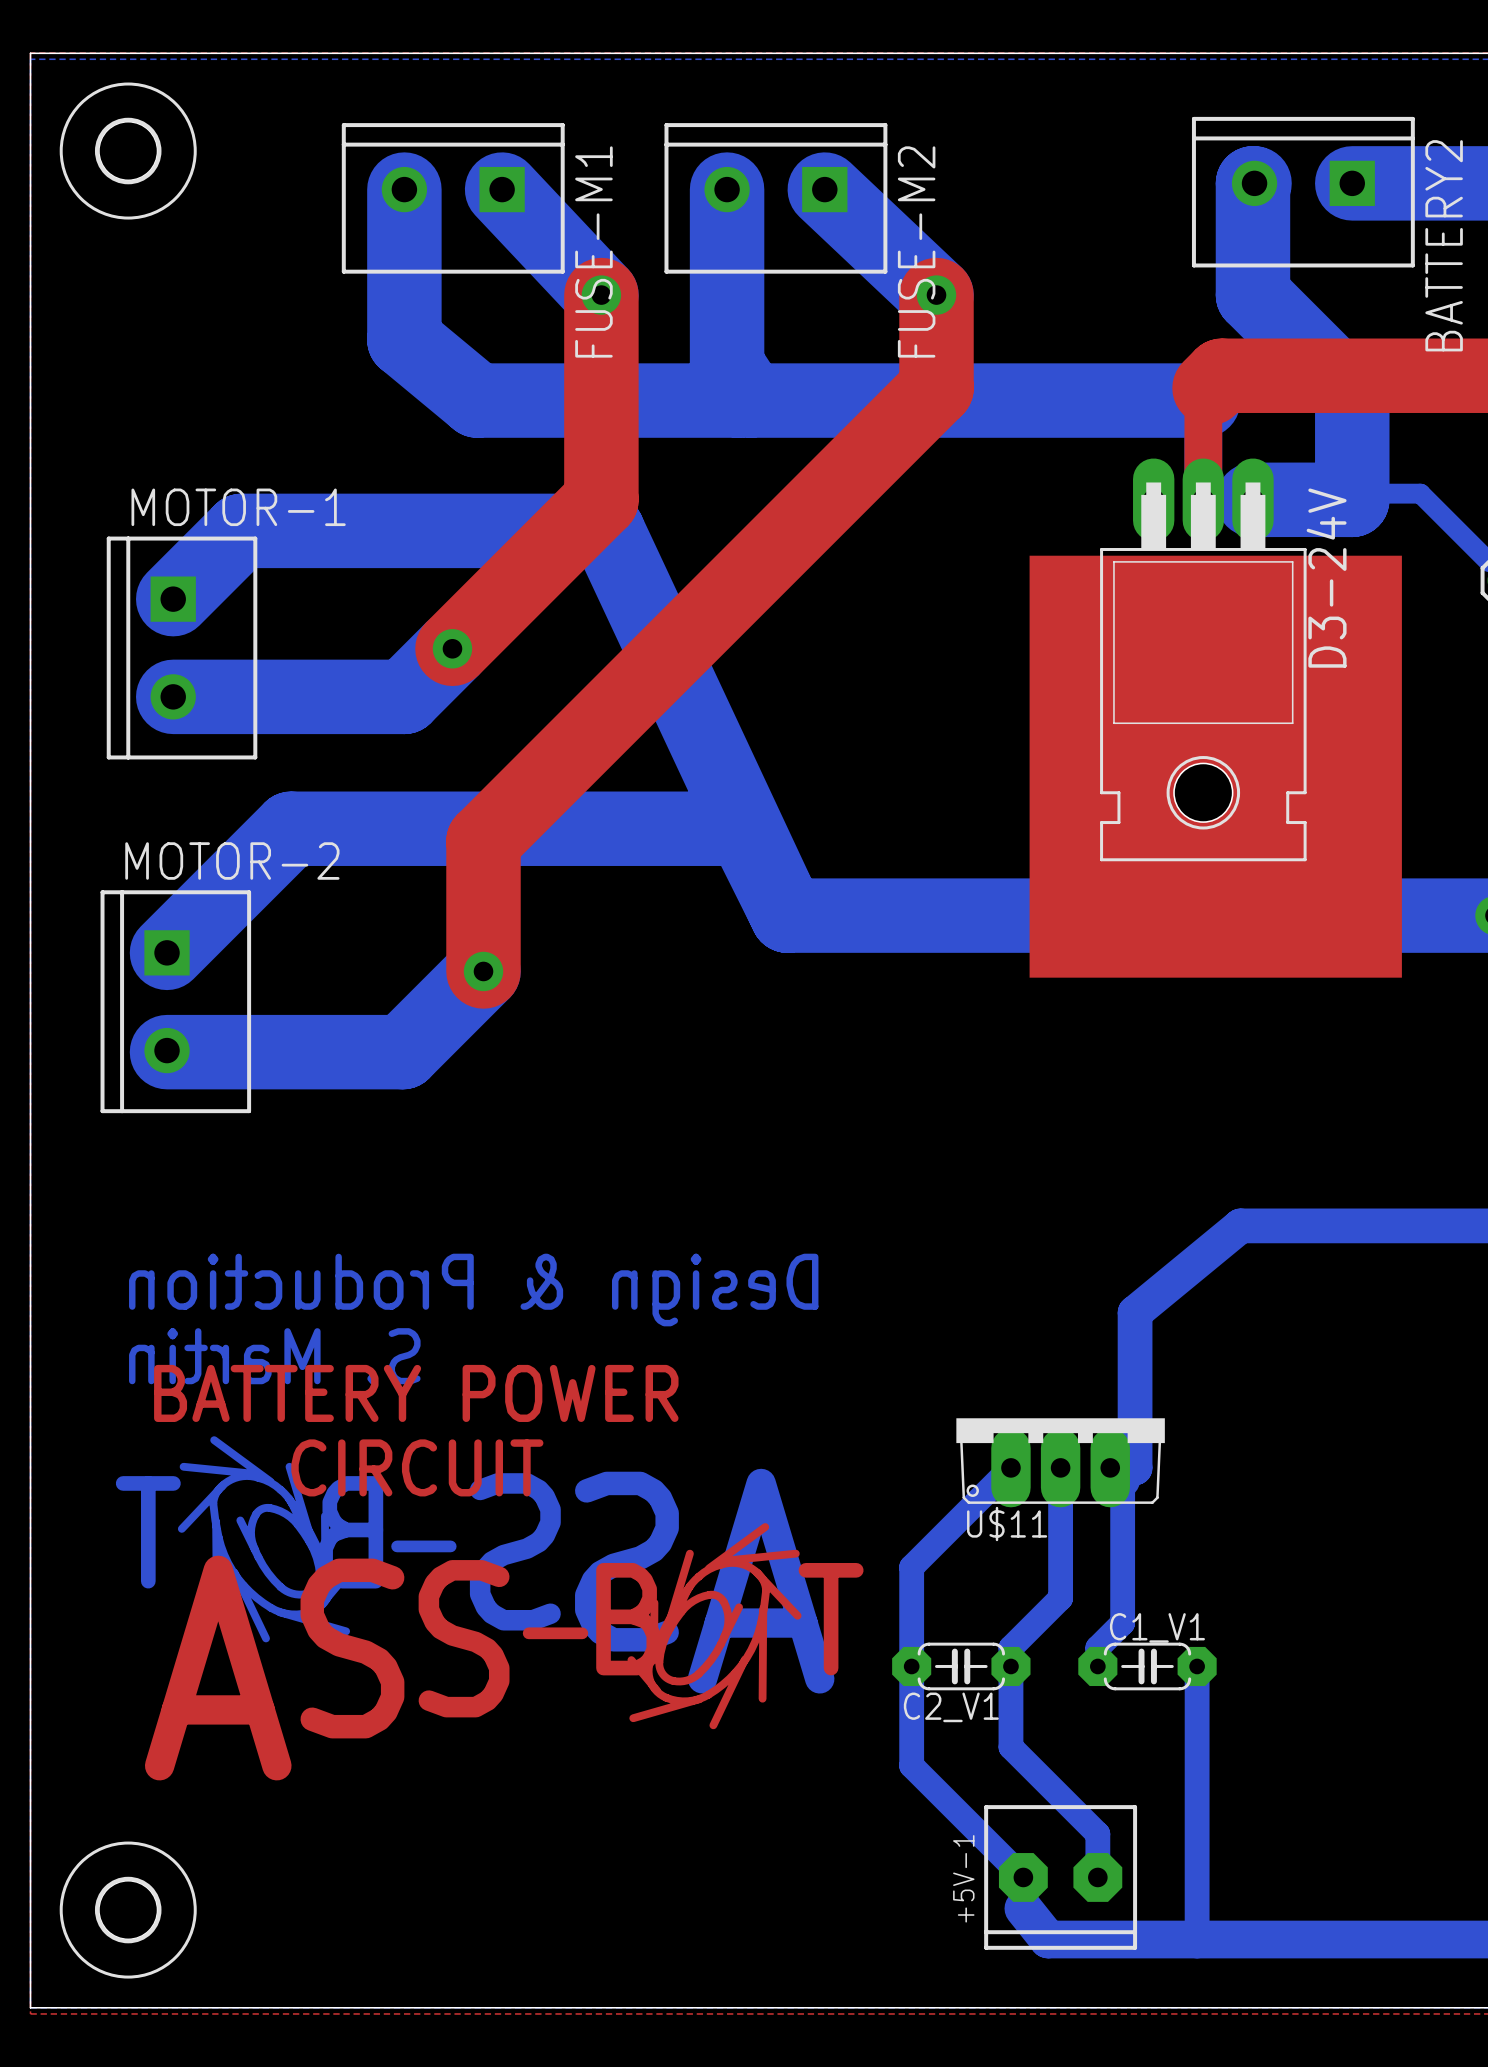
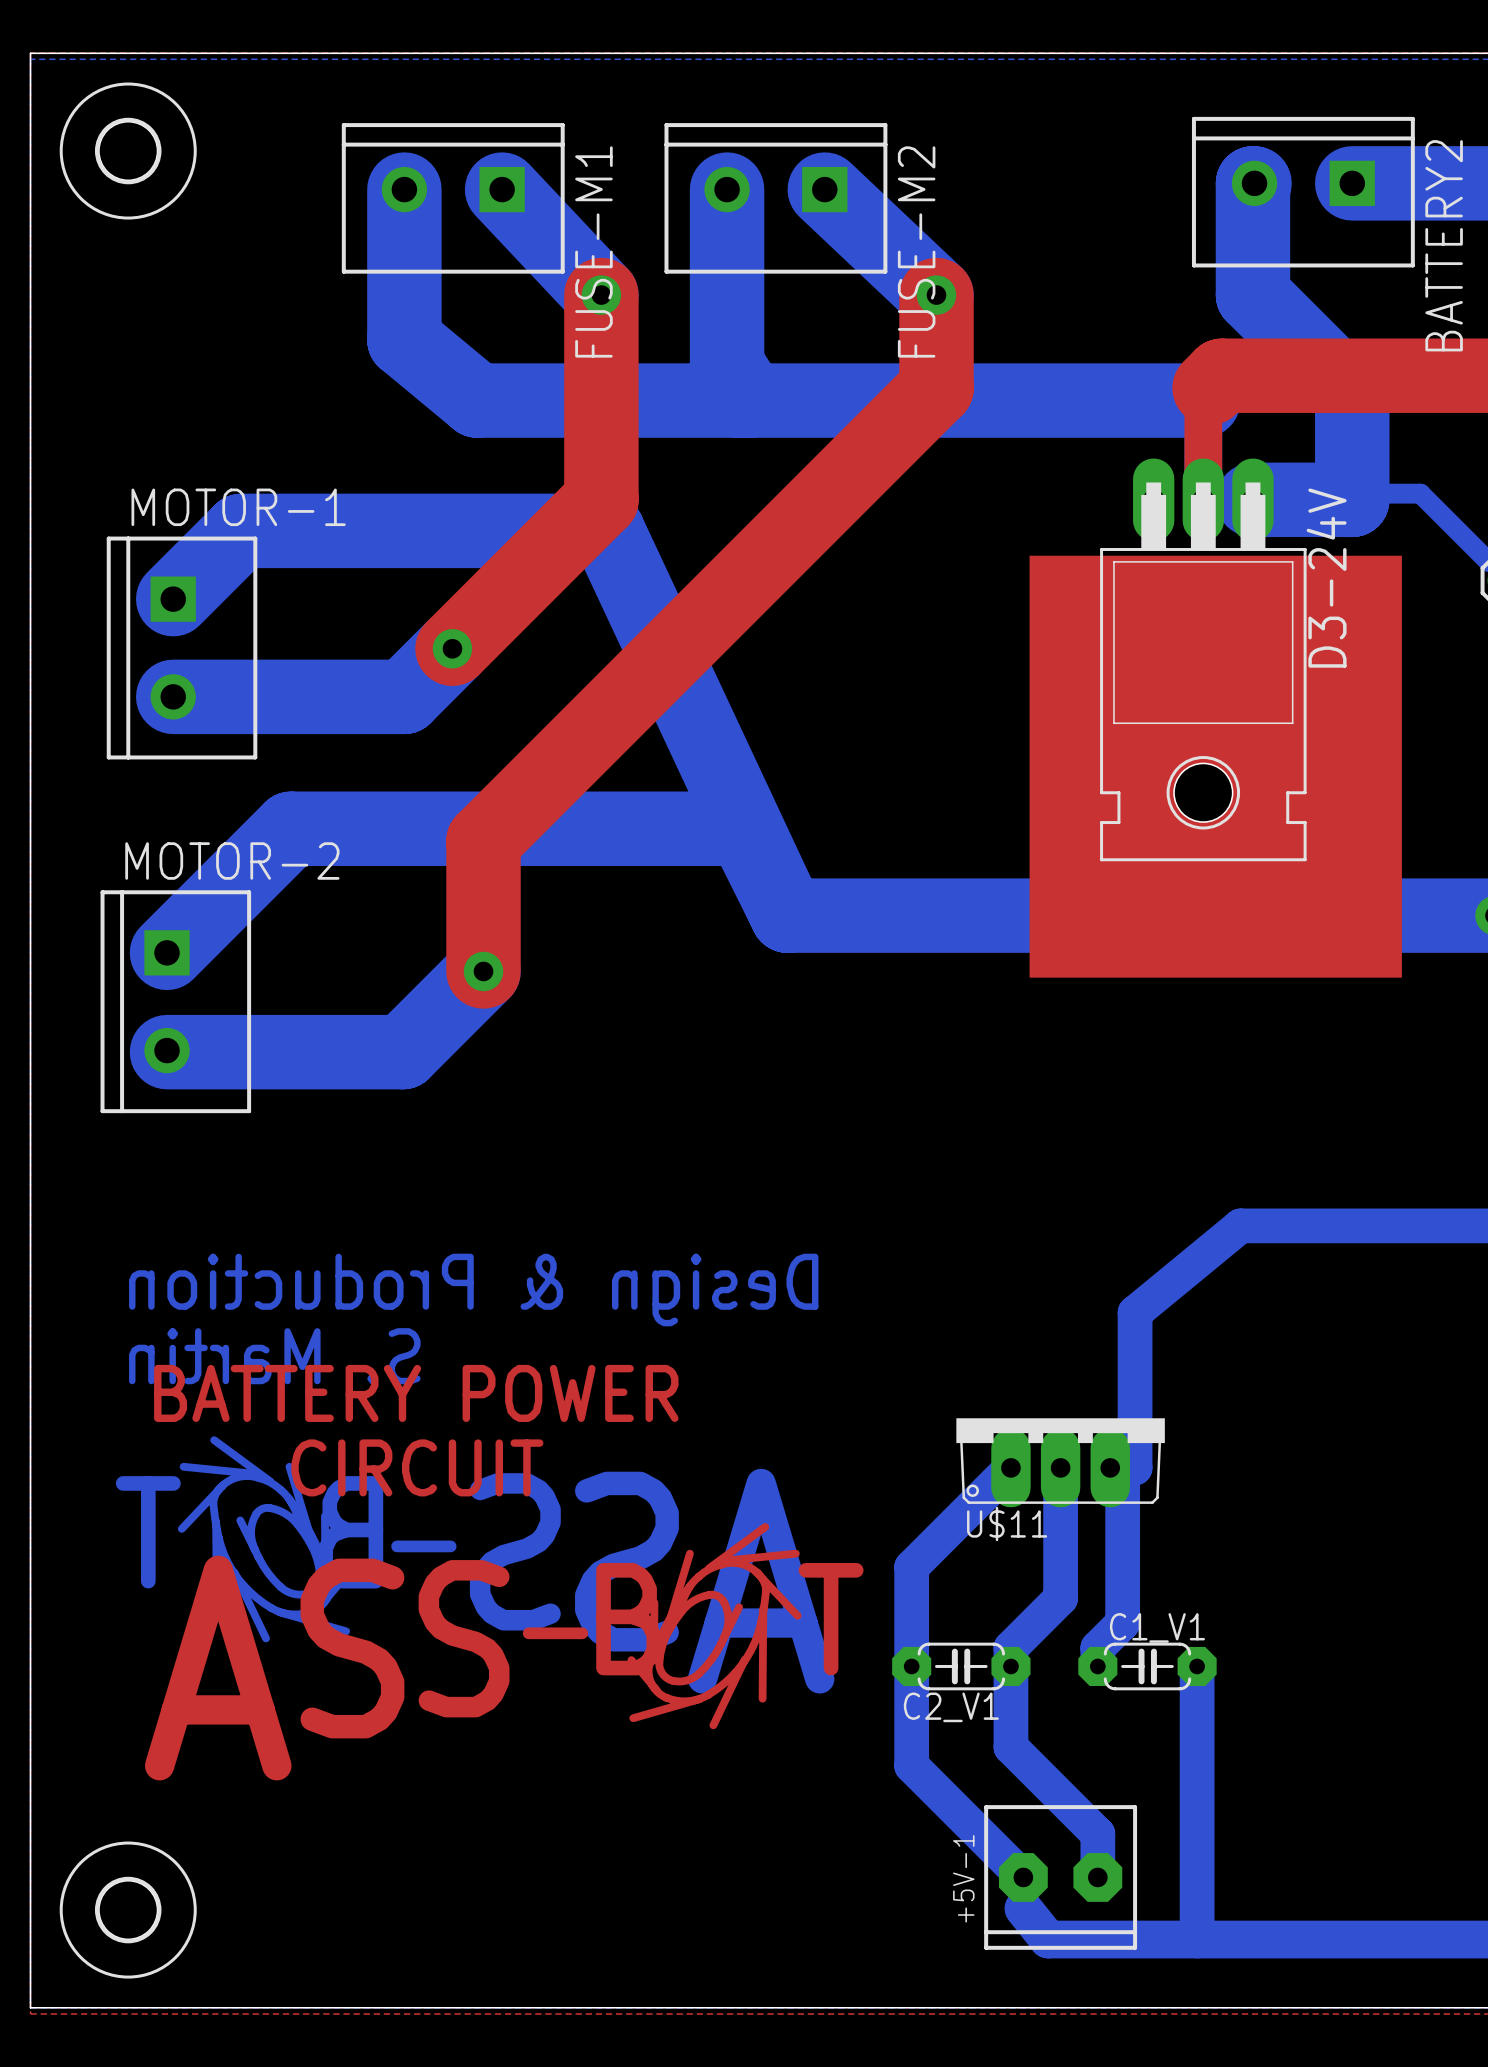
bottom track width: thin (1010, 1467) (911, 1567) (911, 1765) (1023, 1877) -> thick (1010, 1467) (911, 1567) (911, 1765) (1023, 1877)
bottom track width: thin (1060, 1467) (1060, 1598) (1010, 1647) (1010, 1747) (1097, 1834) (1097, 1877) -> thick (1060, 1467) (1060, 1598) (1010, 1647) (1010, 1747) (1097, 1834) (1097, 1877)
bottom track width: thin (1122, 1480) (1122, 1623) (1097, 1647) (1097, 1666) -> thick (1122, 1480) (1122, 1623) (1097, 1647) (1097, 1666)
bottom track width: thin (1197, 1666) (1197, 1939) -> thick (1197, 1666) (1197, 1939)

